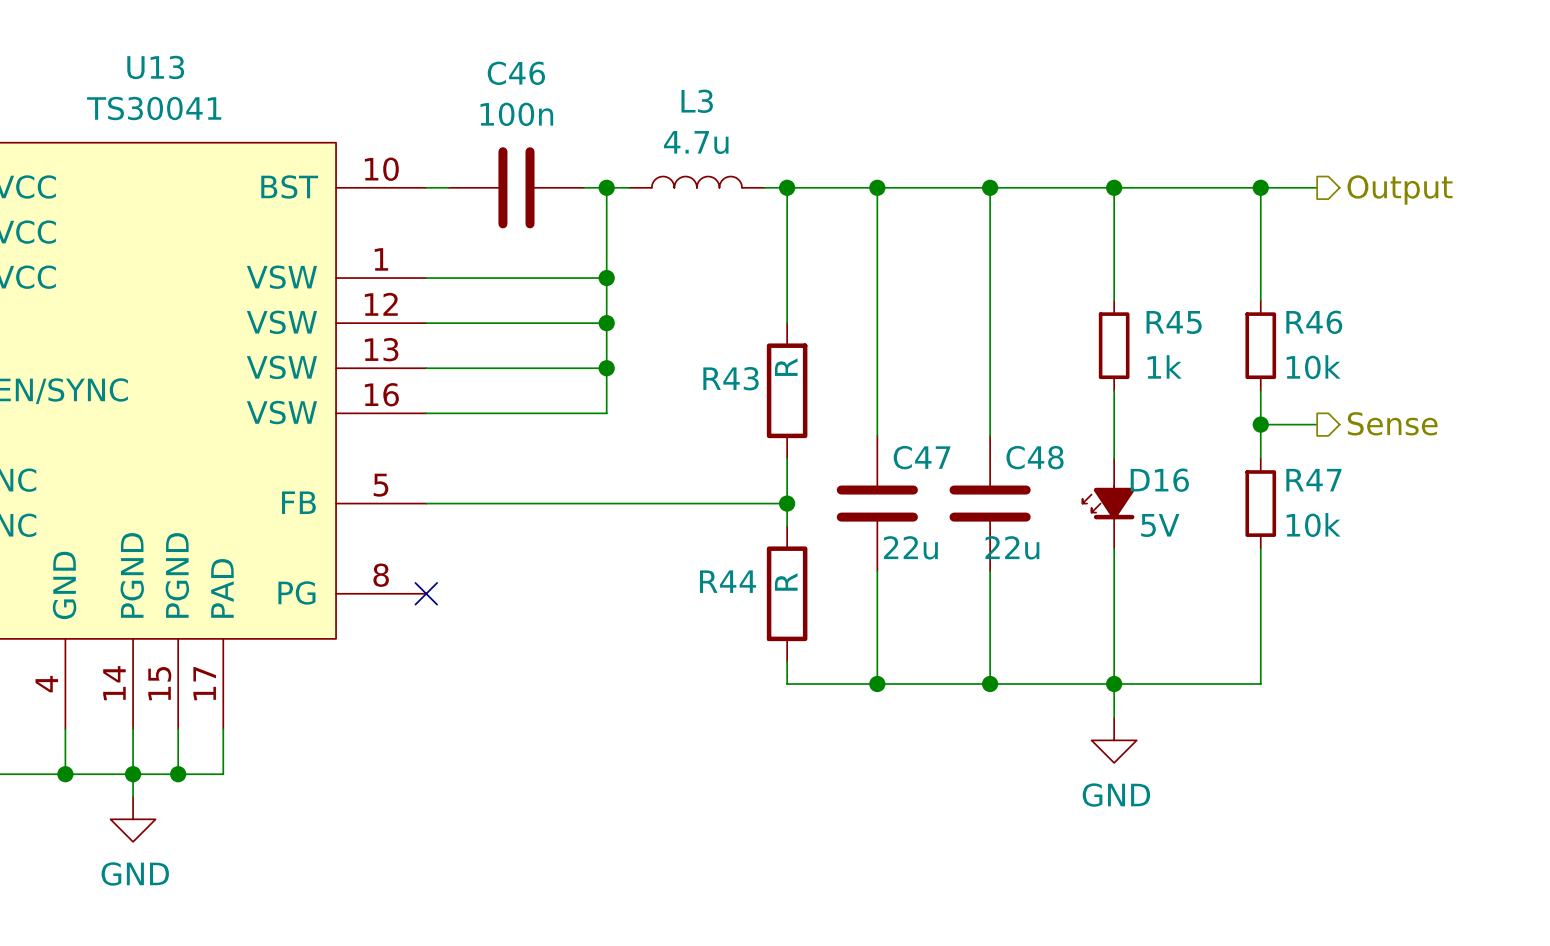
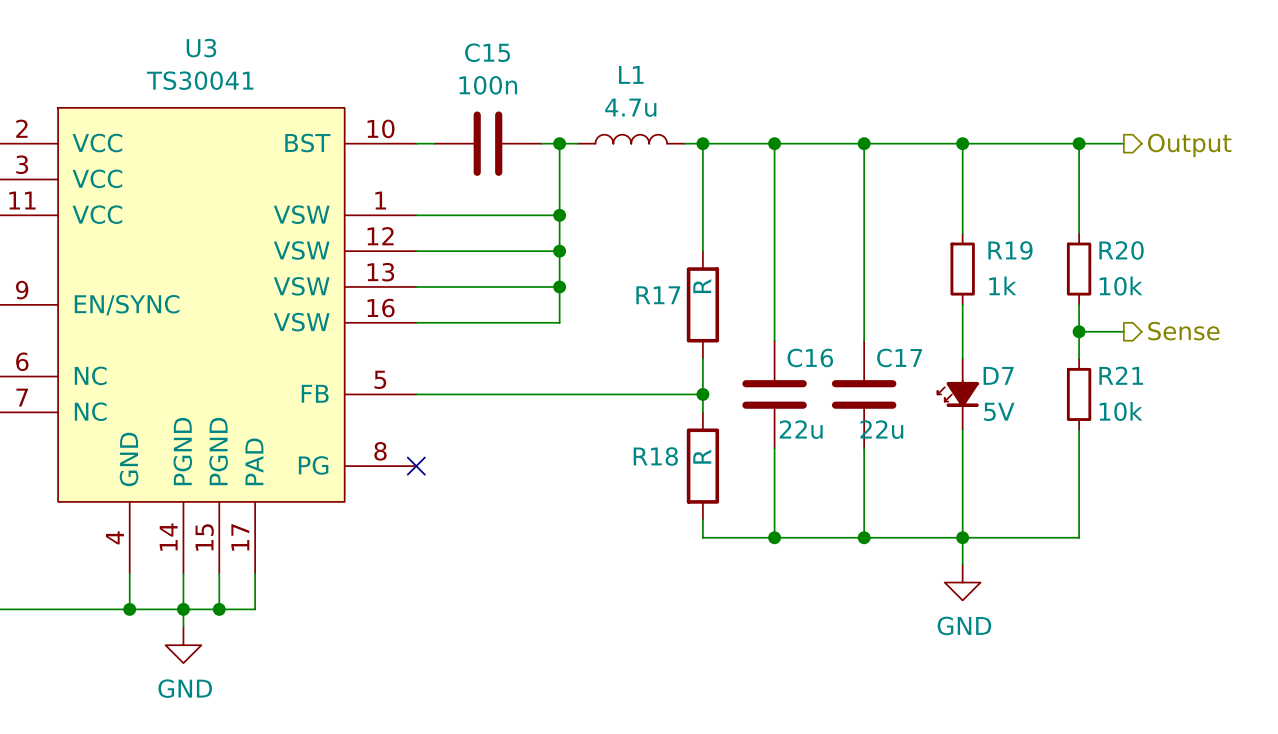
U13 name: U13 (155, 67) -> U3 (201, 48)
C46 name: C46 (516, 73) -> C15 (487, 52)
L3 name: L3 (697, 101) -> L1 (631, 74)
R45 name: R45 (1174, 322) -> R19 (1010, 250)
R46 name: R46 (1314, 322) -> R20 (1121, 250)
R43 name: R43 (731, 378) -> R17 (658, 295)
C47 name: C47 (921, 457) -> C16 (810, 357)
C48 name: C48 (1035, 457) -> C17 (899, 357)
D16 name: D16 (1159, 480) -> D7 (998, 375)
R47 name: R47 (1313, 480) -> R21 (1121, 375)
R44 name: R44 (727, 581) -> R18 (655, 456)

